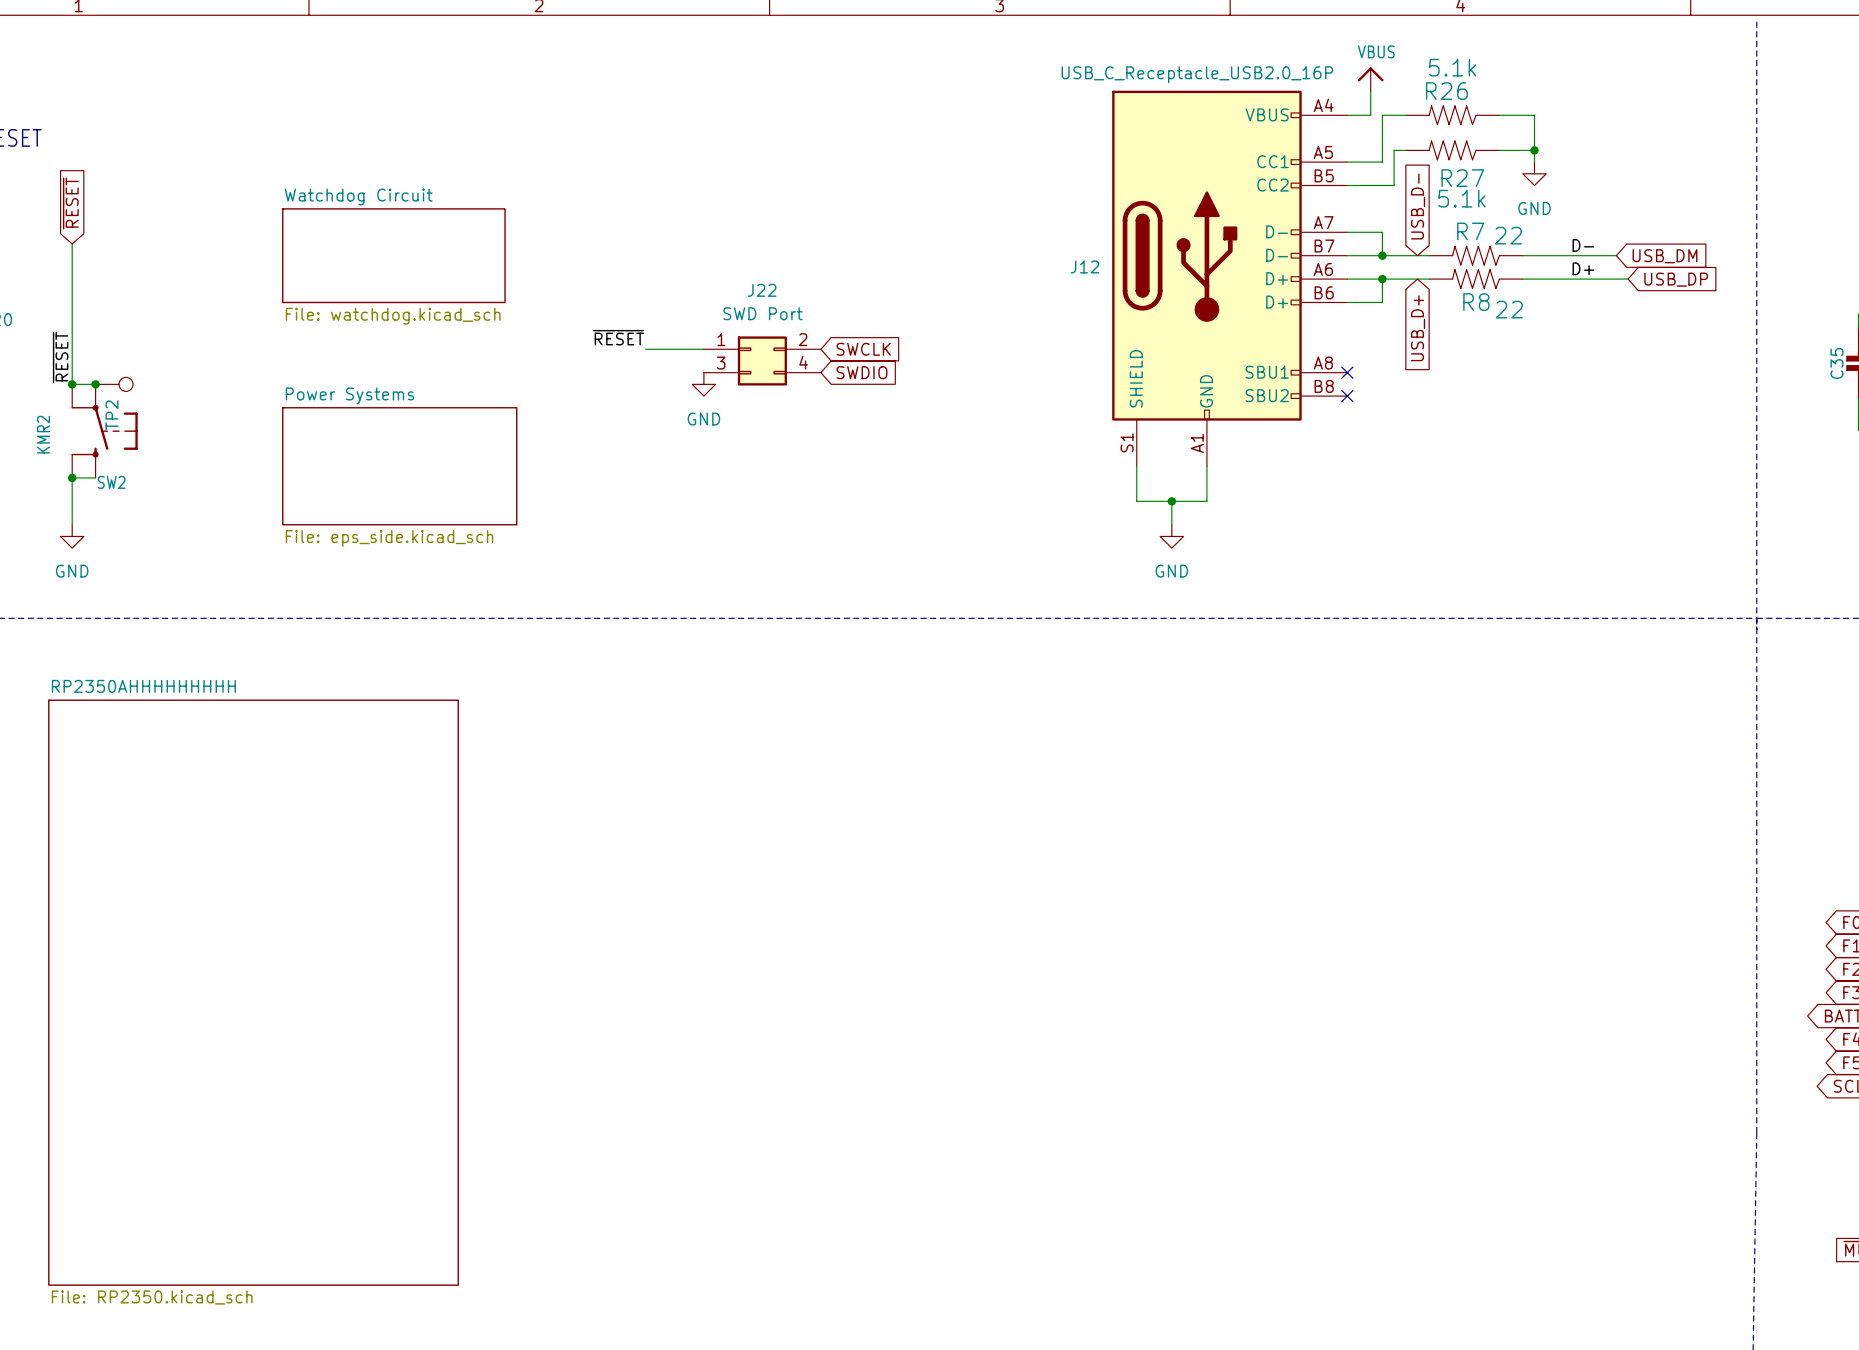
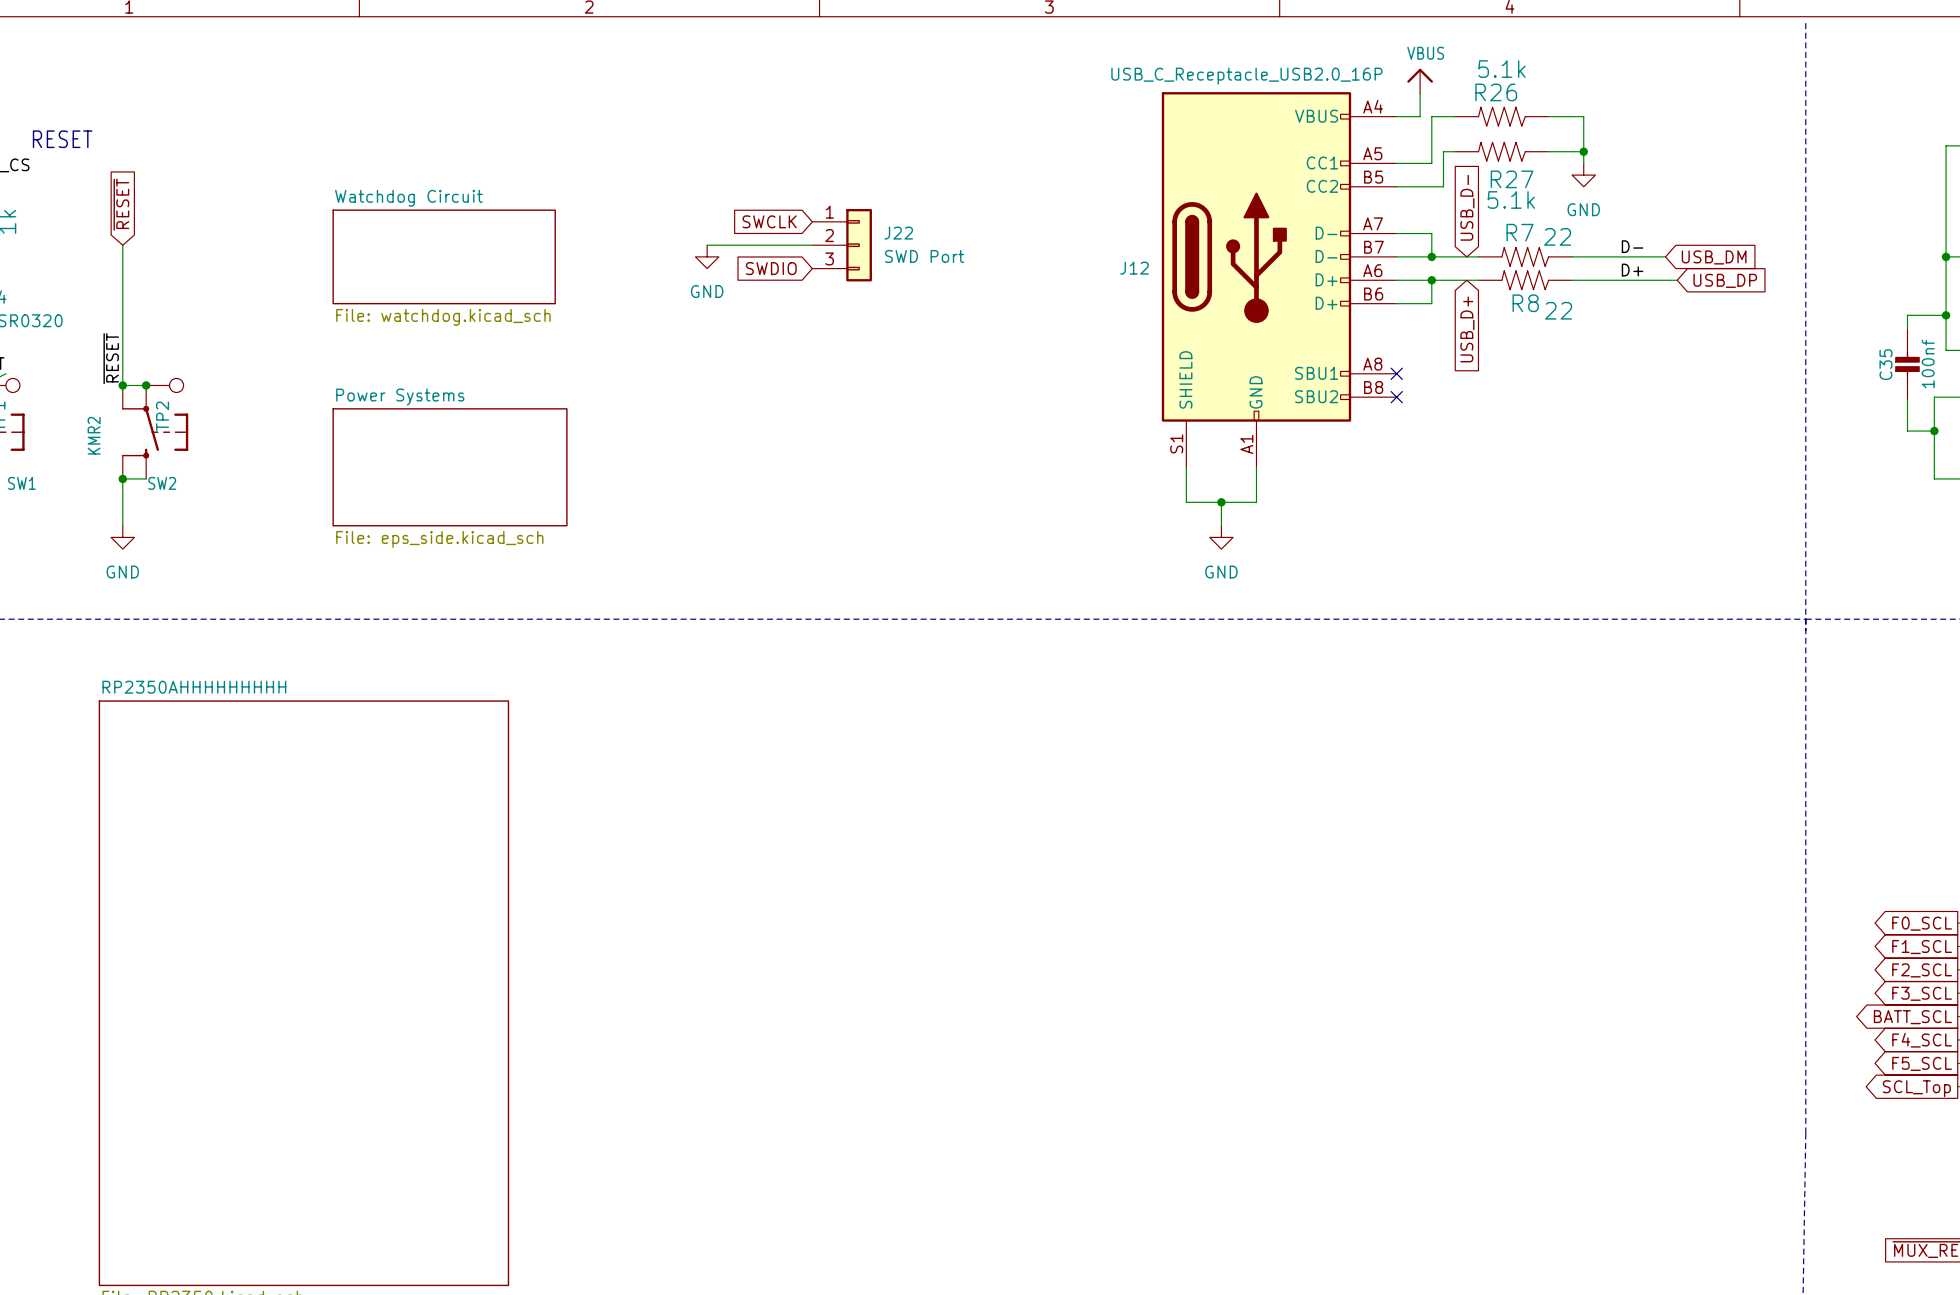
wire: none -> (707, 245) (812, 245)
J22 name position: J22 (762, 290) -> J22 (898, 233)
J22 value position: SWD Port (762, 313) -> SWD Port (924, 256)
J22 symbol: [703, 336, 821, 386] -> [812, 208, 872, 282]
label: ~{RESET} (618, 337) -> none
wire: (645, 349) (703, 349) -> none
global label rotation: 0° (863, 349) -> 180° (769, 221)
global label position: SWCLK (863, 349) -> SWCLK (769, 221)
global label rotation: 0° (861, 372) -> 180° (771, 268)
global label position: SWDIO (861, 372) -> SWDIO (771, 268)
power symbol position: GND (703, 384) -> GND (707, 256)

